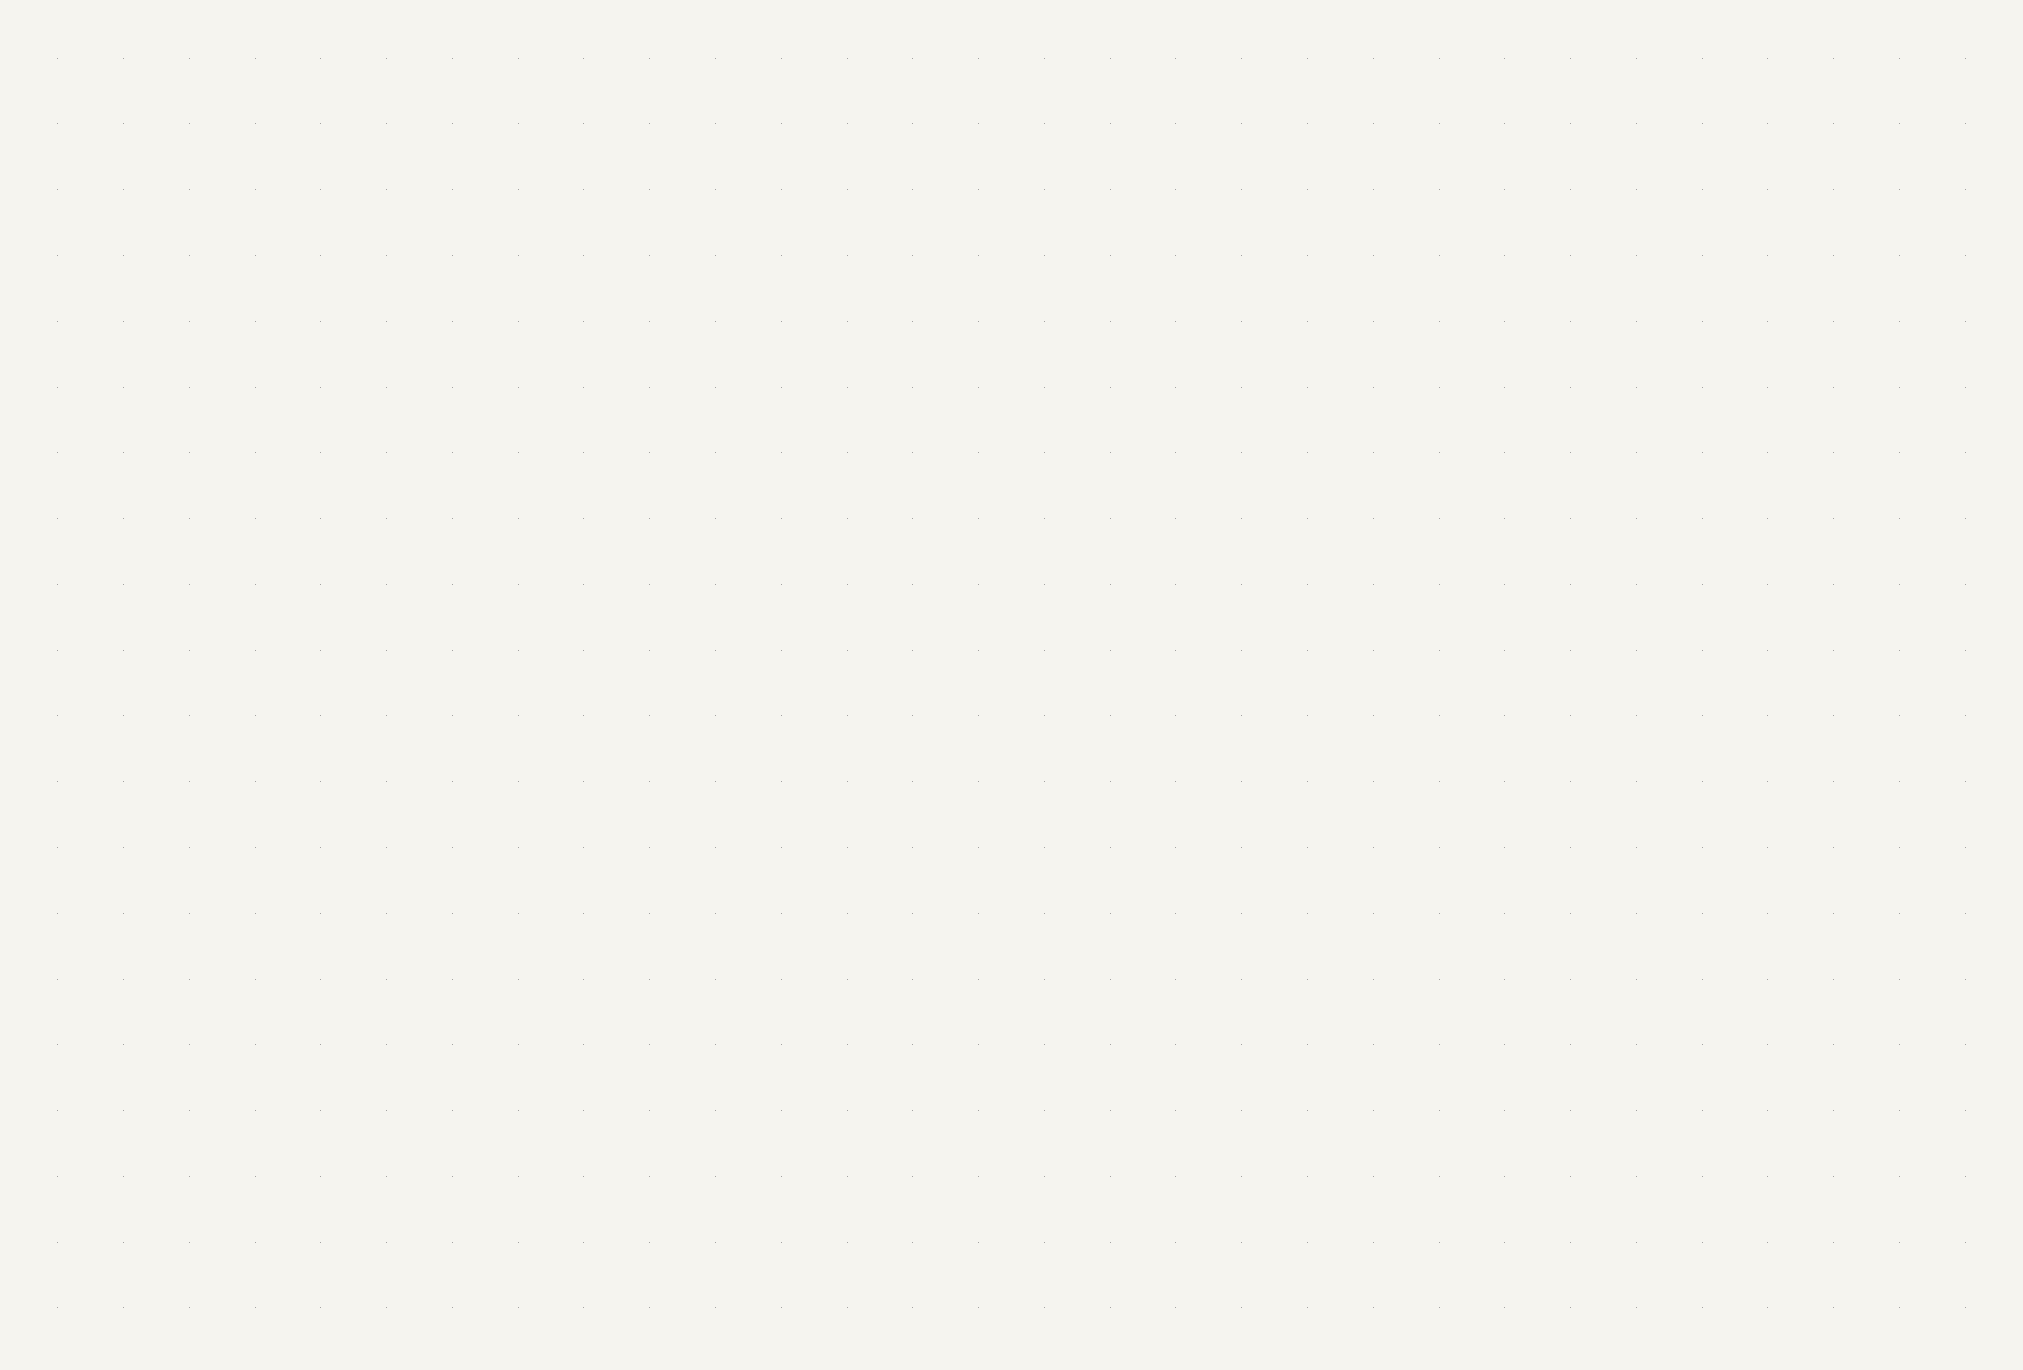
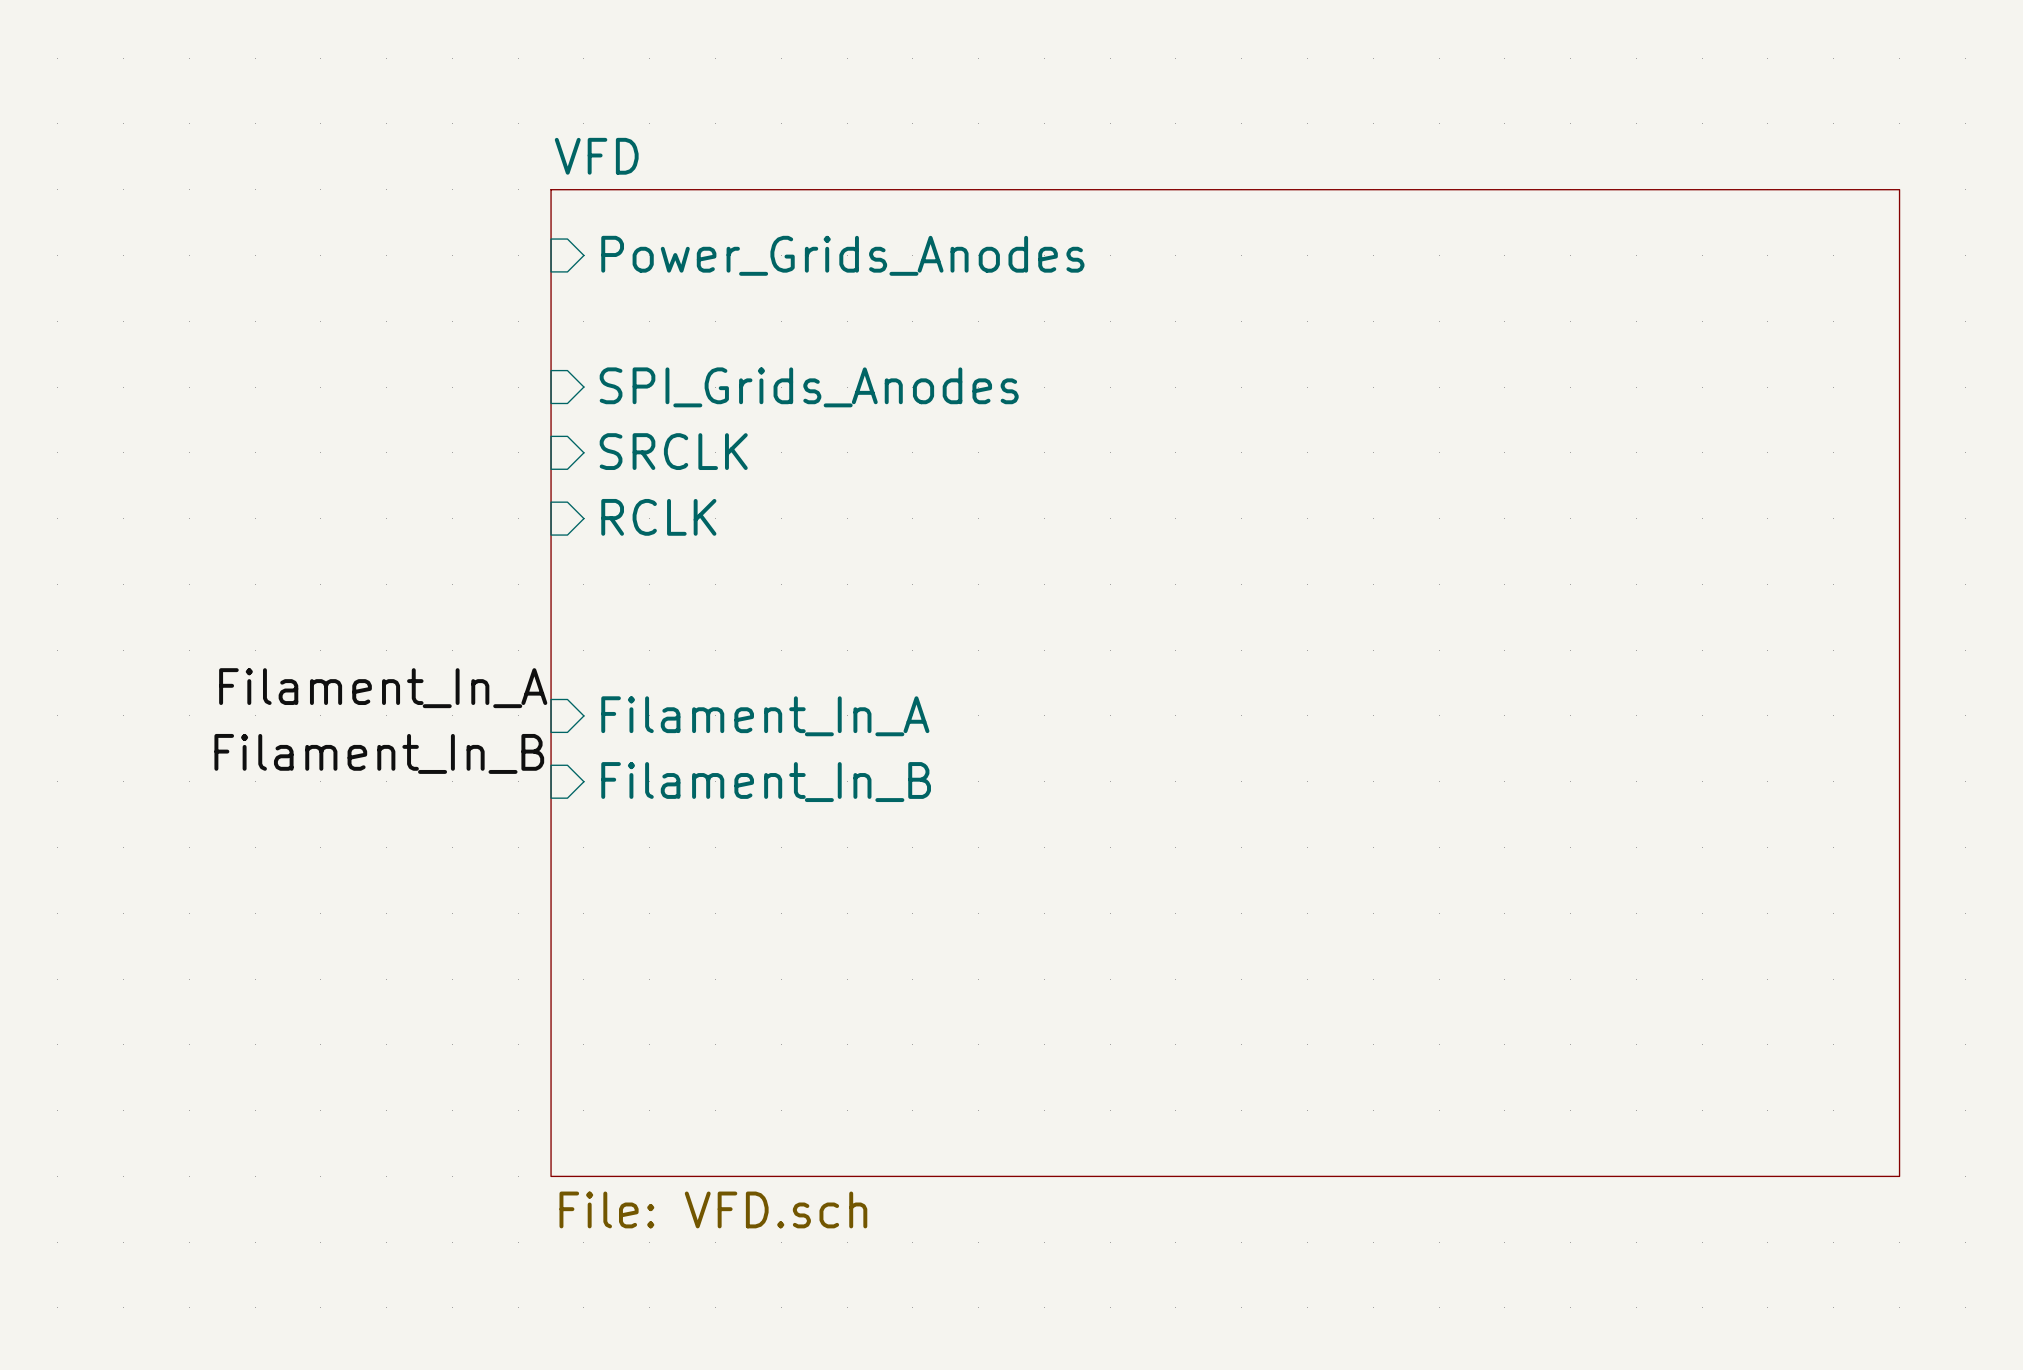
sheet pin: none -> Power_Grids_Anodes (842, 255)
sheet pin: none -> SPI_Grids_Anodes (809, 387)
sheet pin: none -> SRCLK (673, 451)
sheet pin: none -> RCLK (658, 517)
sheet VFD: none -> File: VFD.sch (1225, 683)
label: none -> Filament_In_A (383, 688)
sheet pin: none -> Filament_In_A (765, 716)
label: none -> Filament_In_B (379, 753)
sheet pin: none -> Filament_In_B (766, 782)

